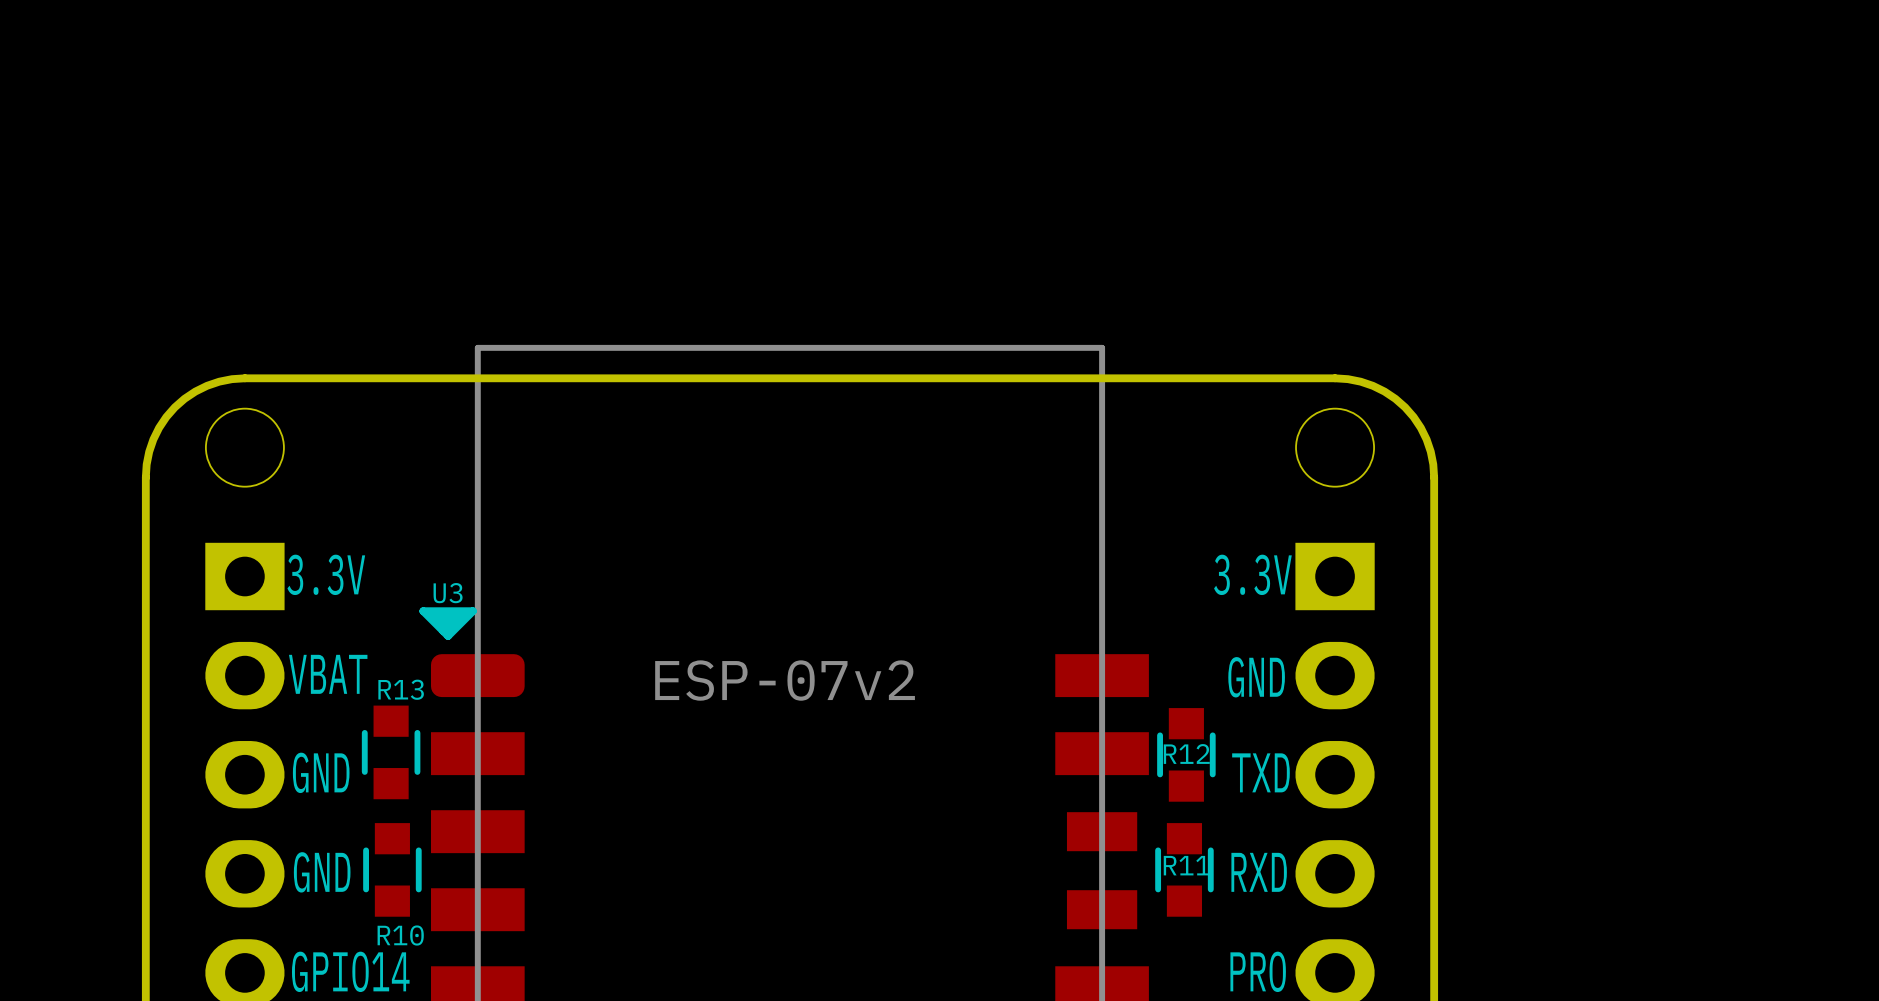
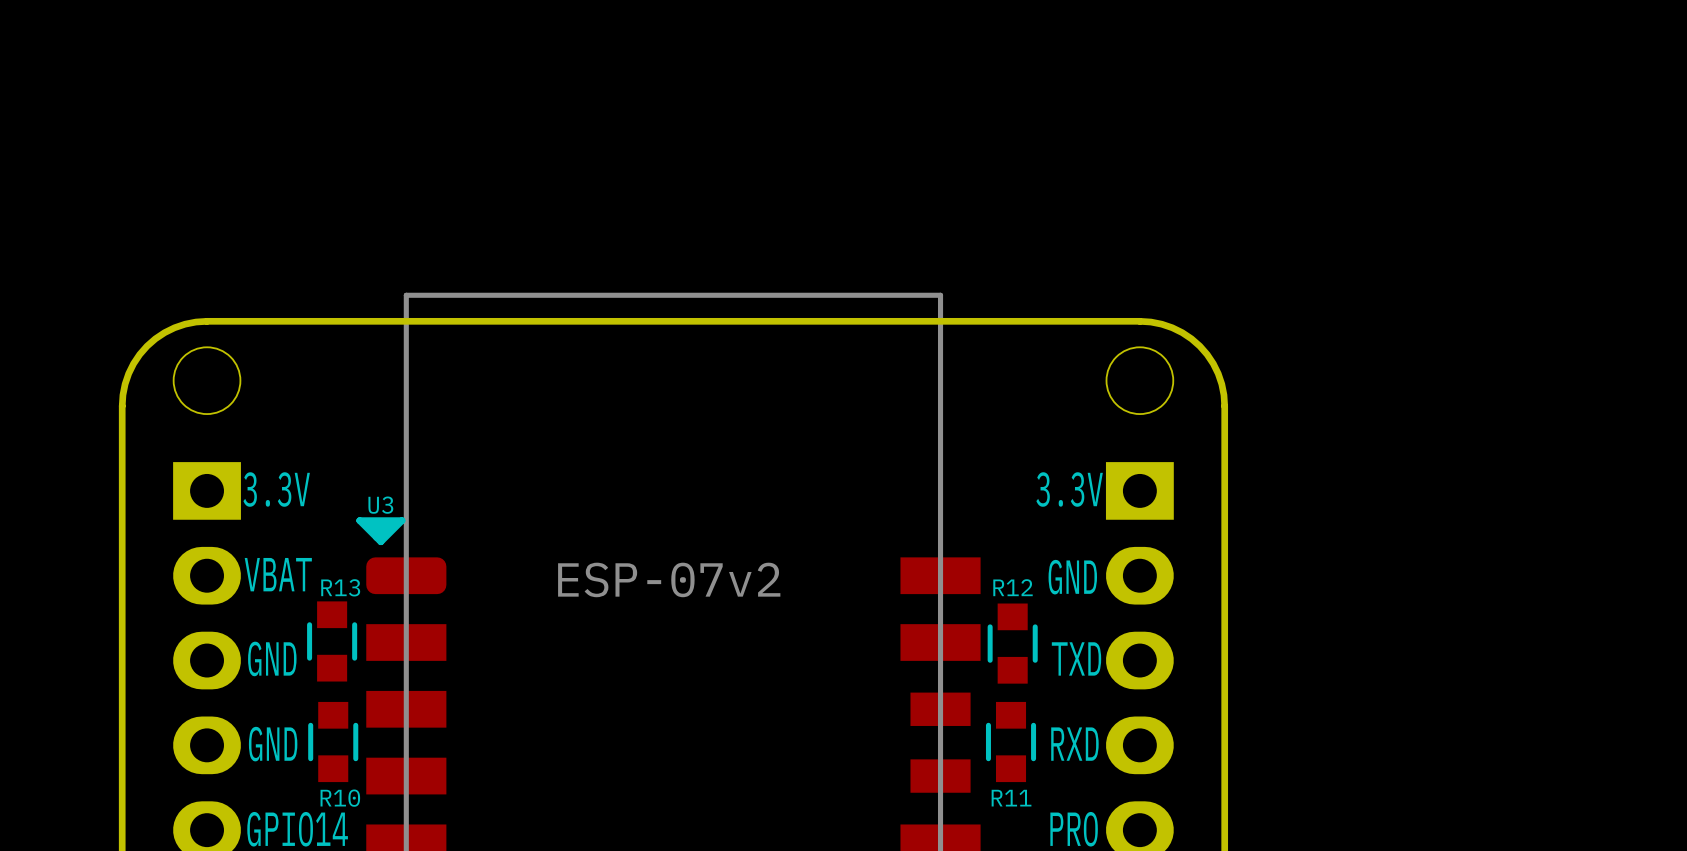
R12 name position: R12 (1186, 753) -> R12 (1013, 587)
R11 name position: R11 (1187, 865) -> R11 (1011, 798)

